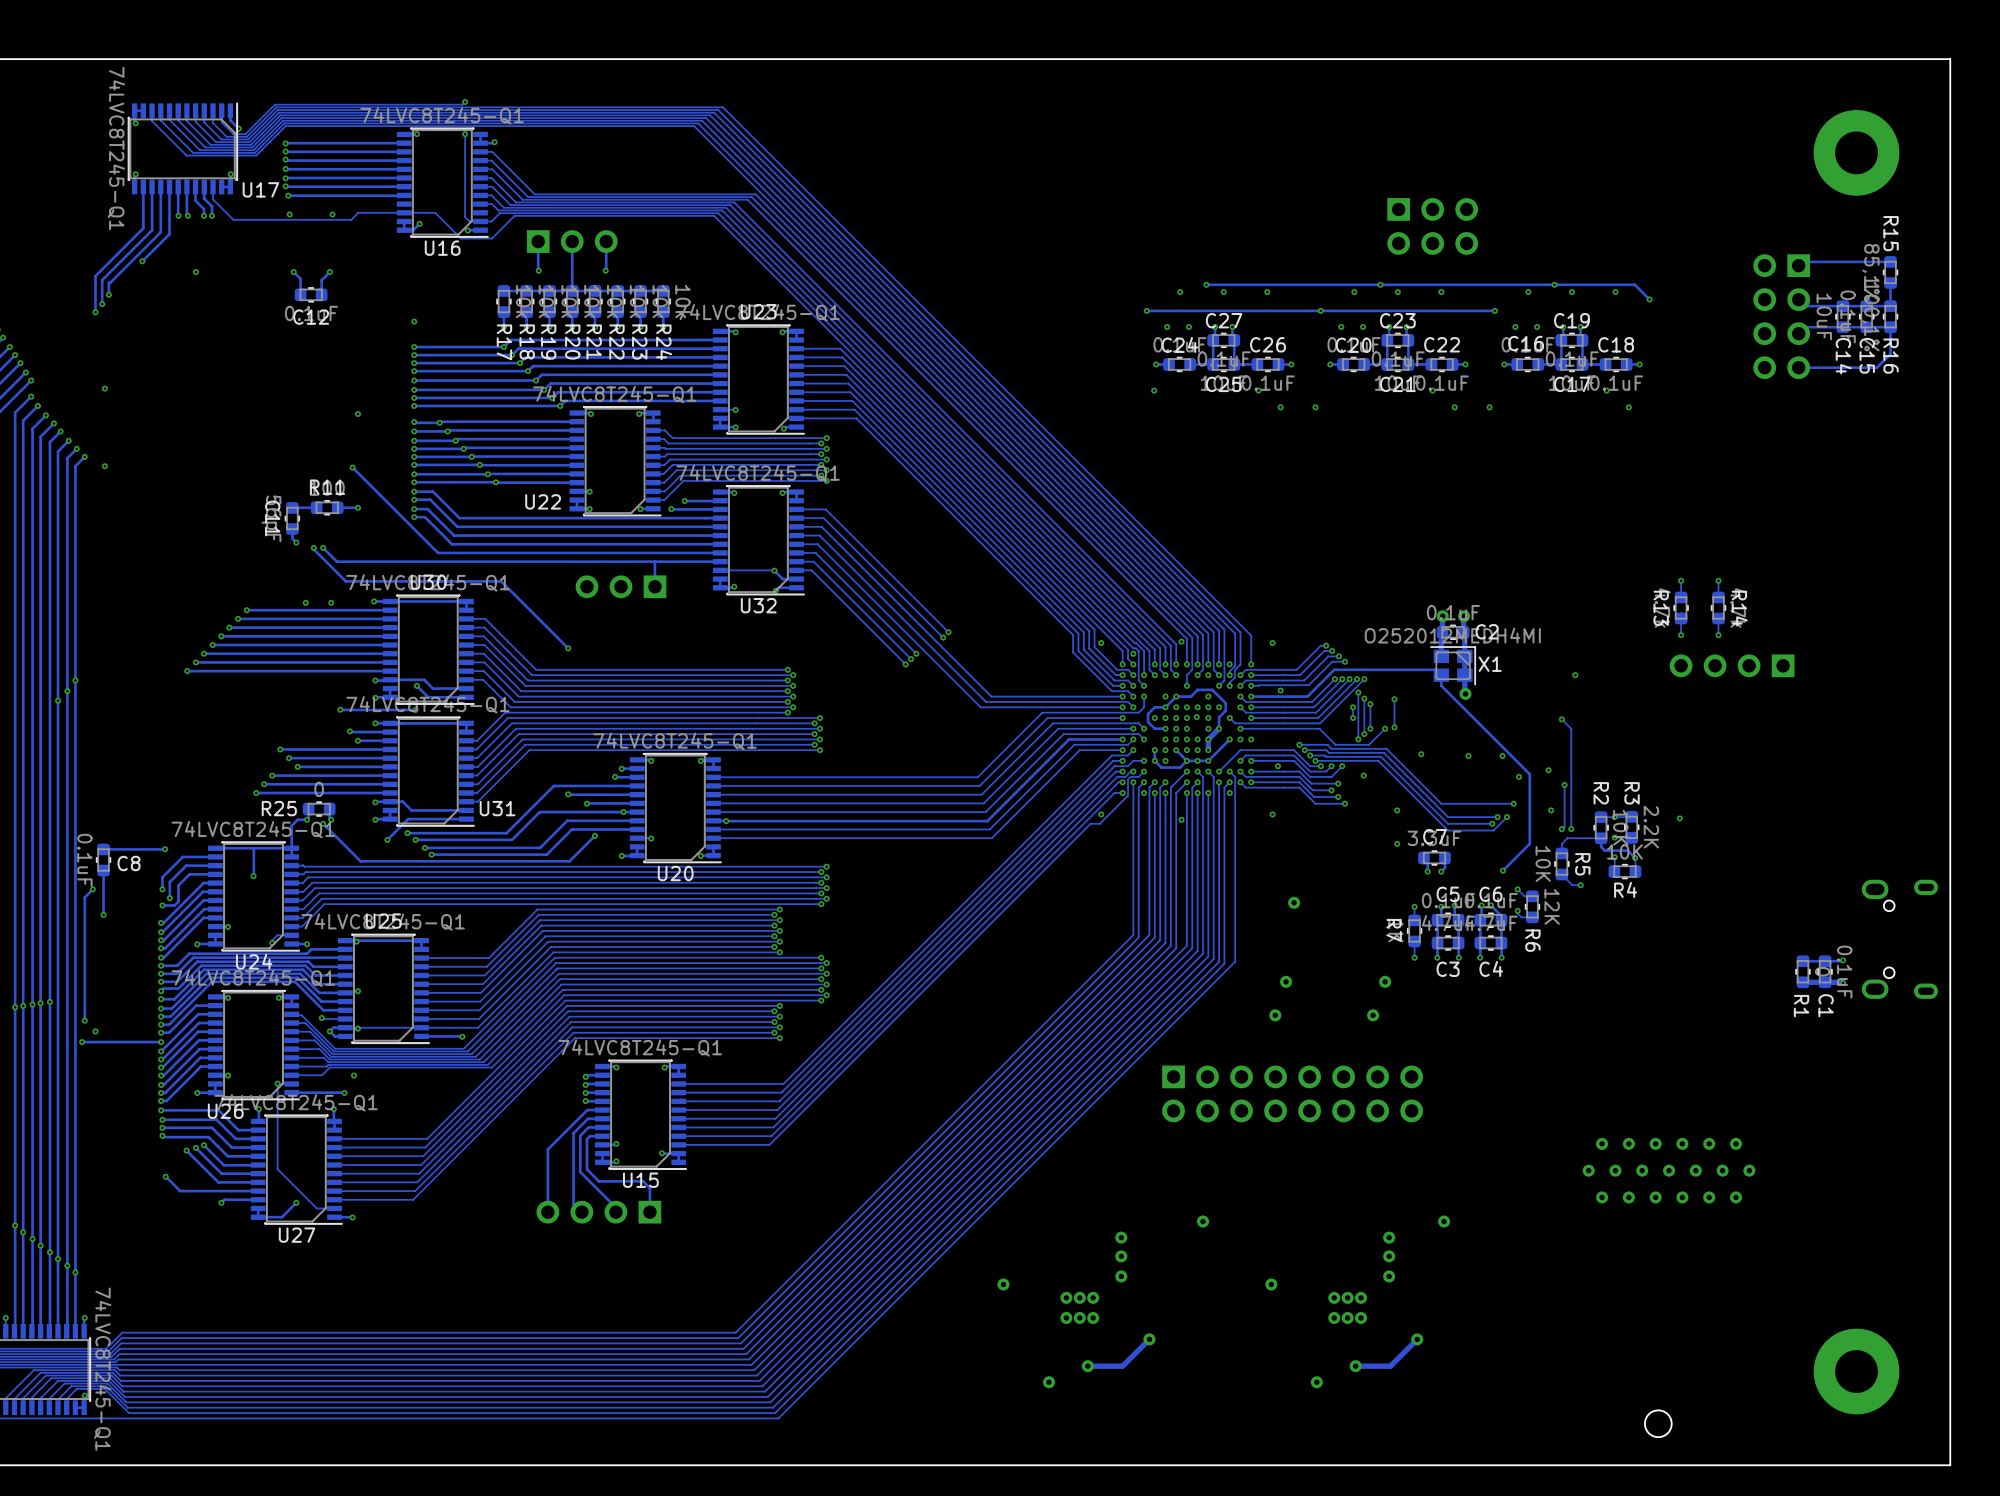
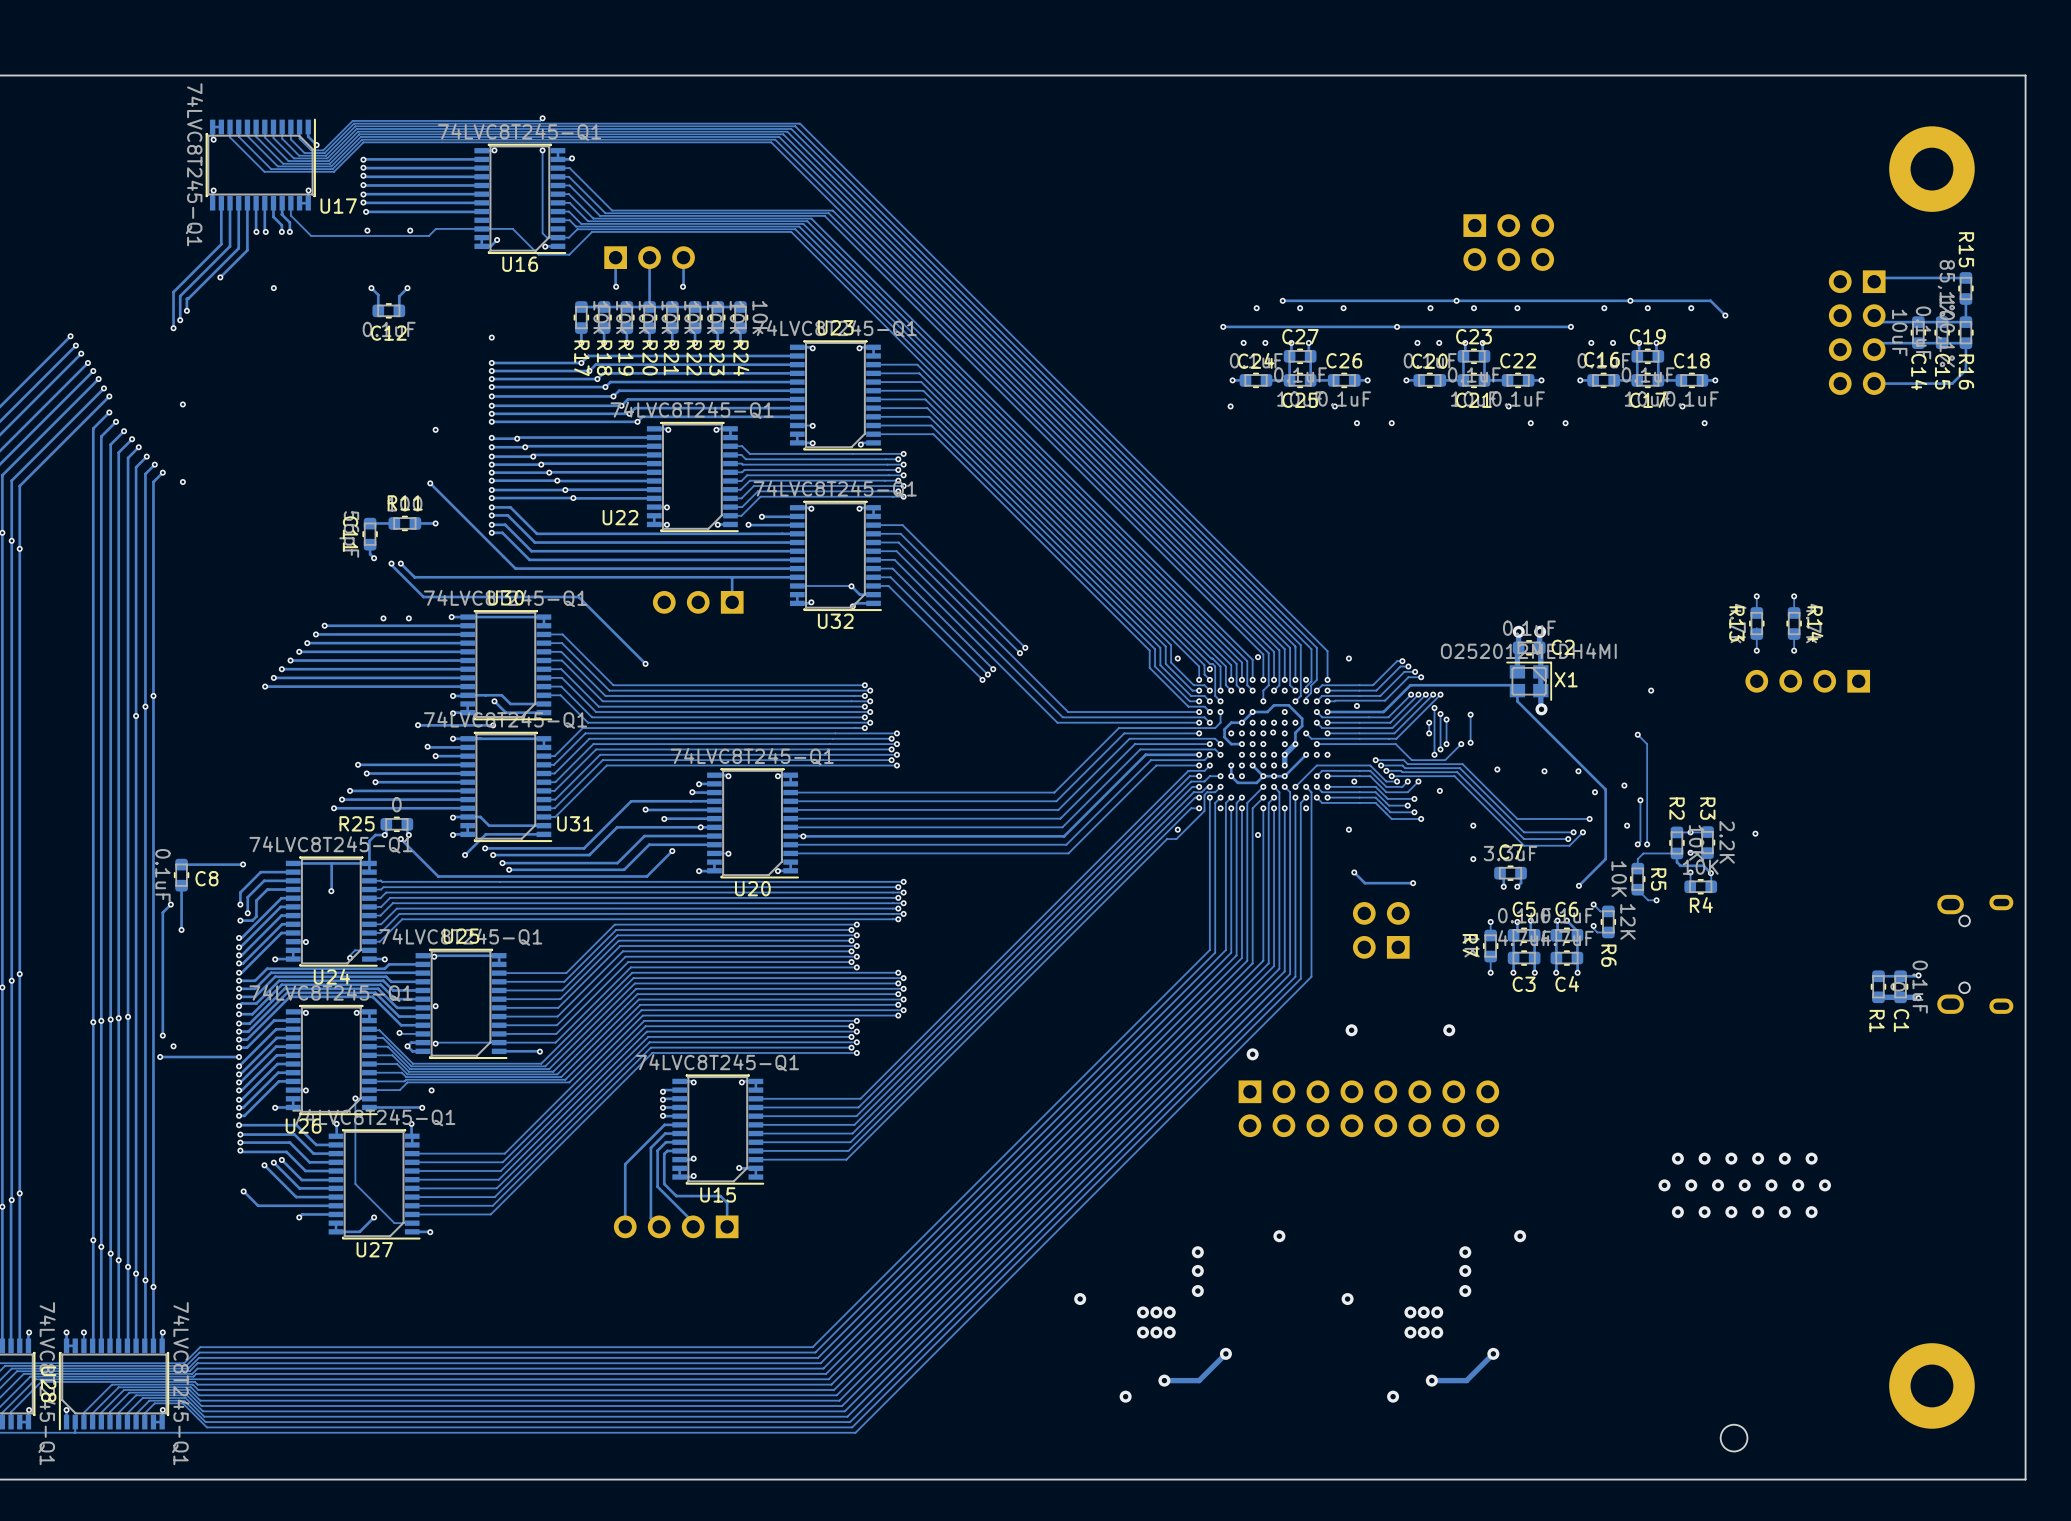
track: none -> (1354, 872) (1364, 883) (1413, 883)
via: none -> (1354, 872)
via: none -> (1413, 883)
via: (1294, 902) -> none
part: none -> (1381, 930)
via: (1286, 981) -> none
via: (1385, 981) -> none
via: none -> (1252, 1054)

